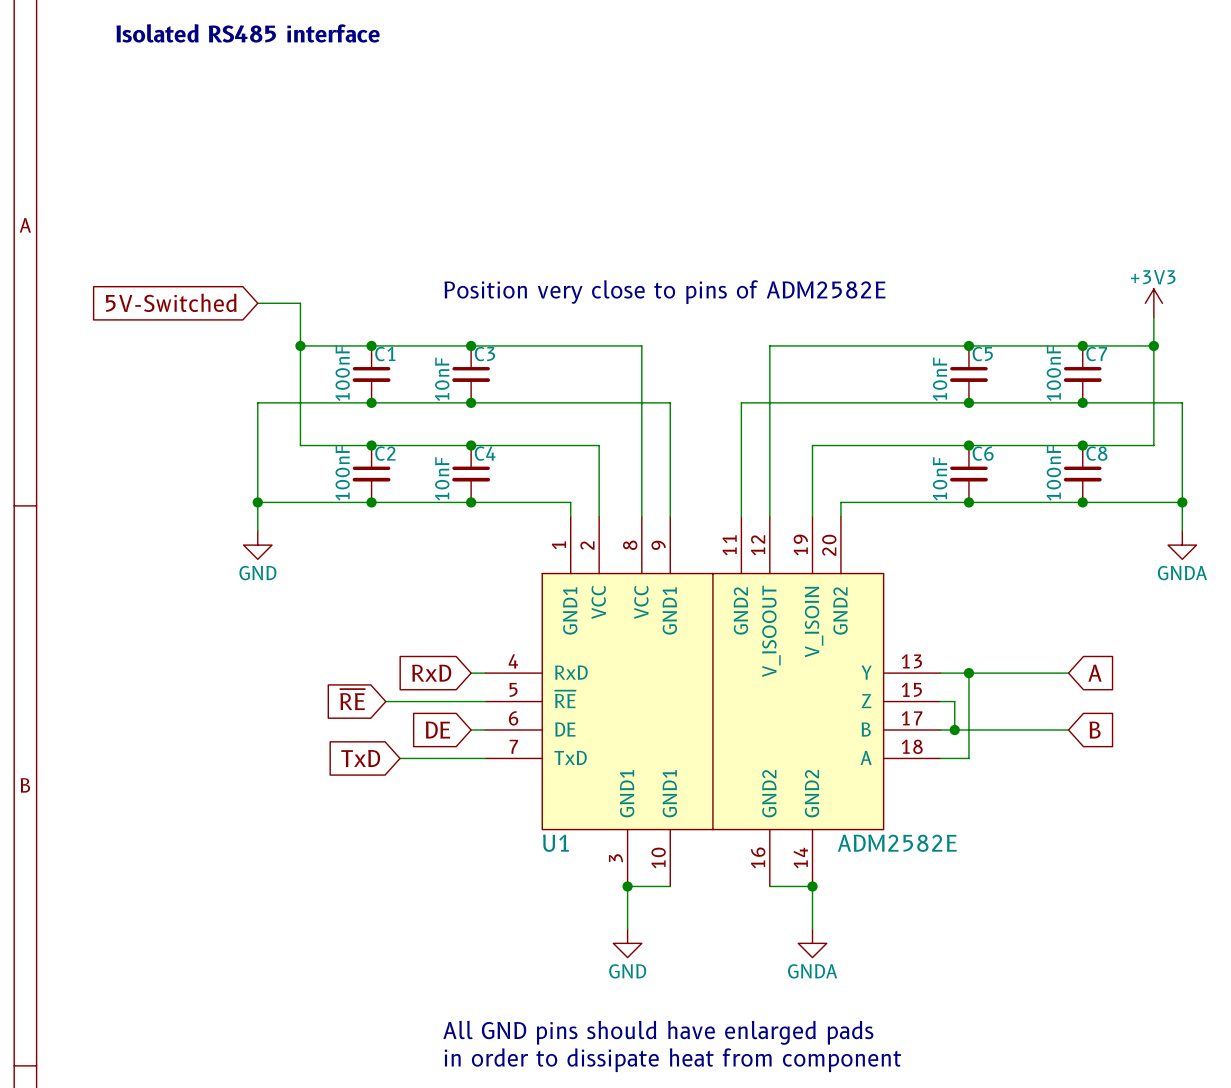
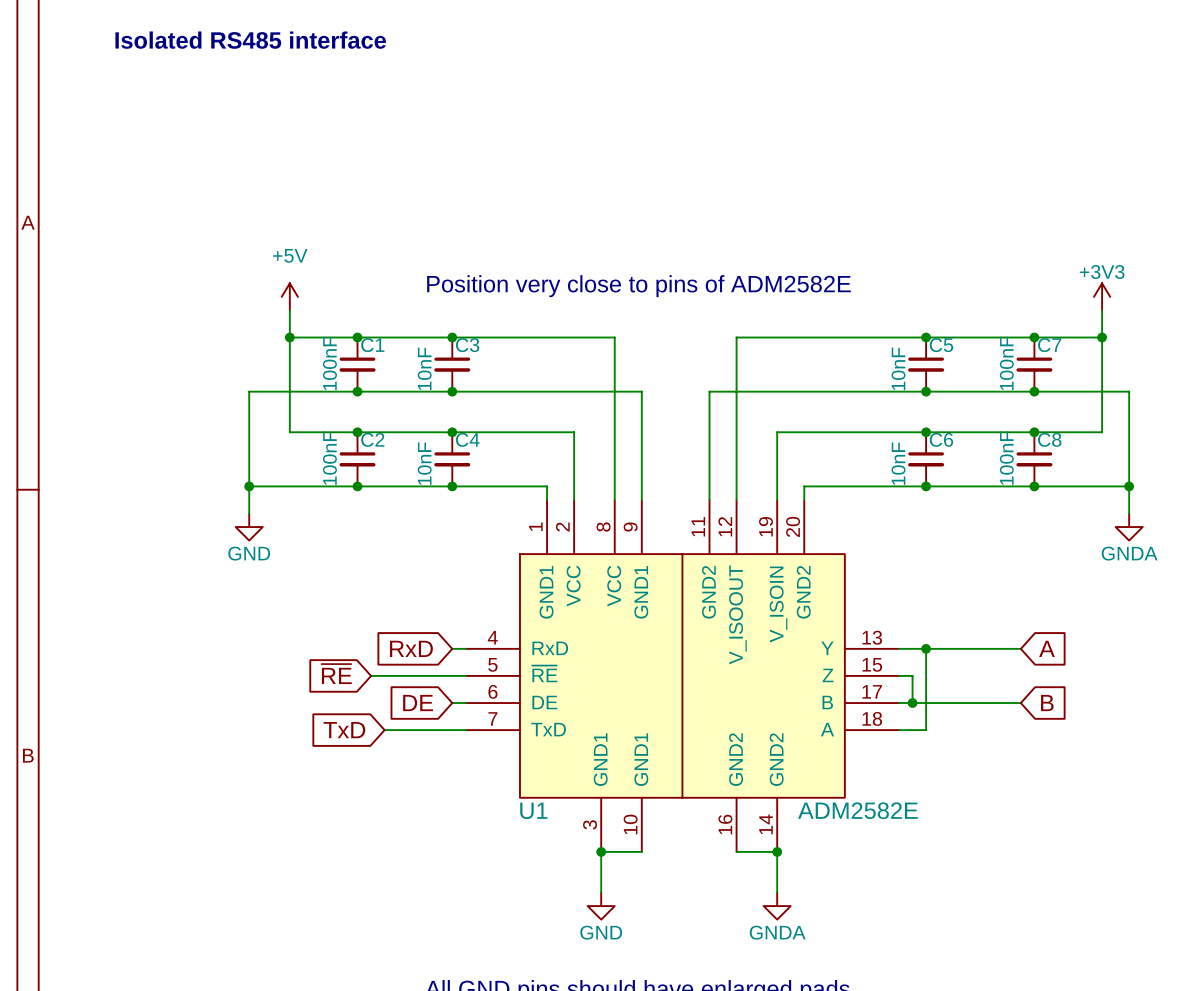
global label: 5V-Switched (171, 302) -> none
wire: (257, 303) (300, 303) (300, 317) -> none
power symbol: none -> +5V (289, 296)

